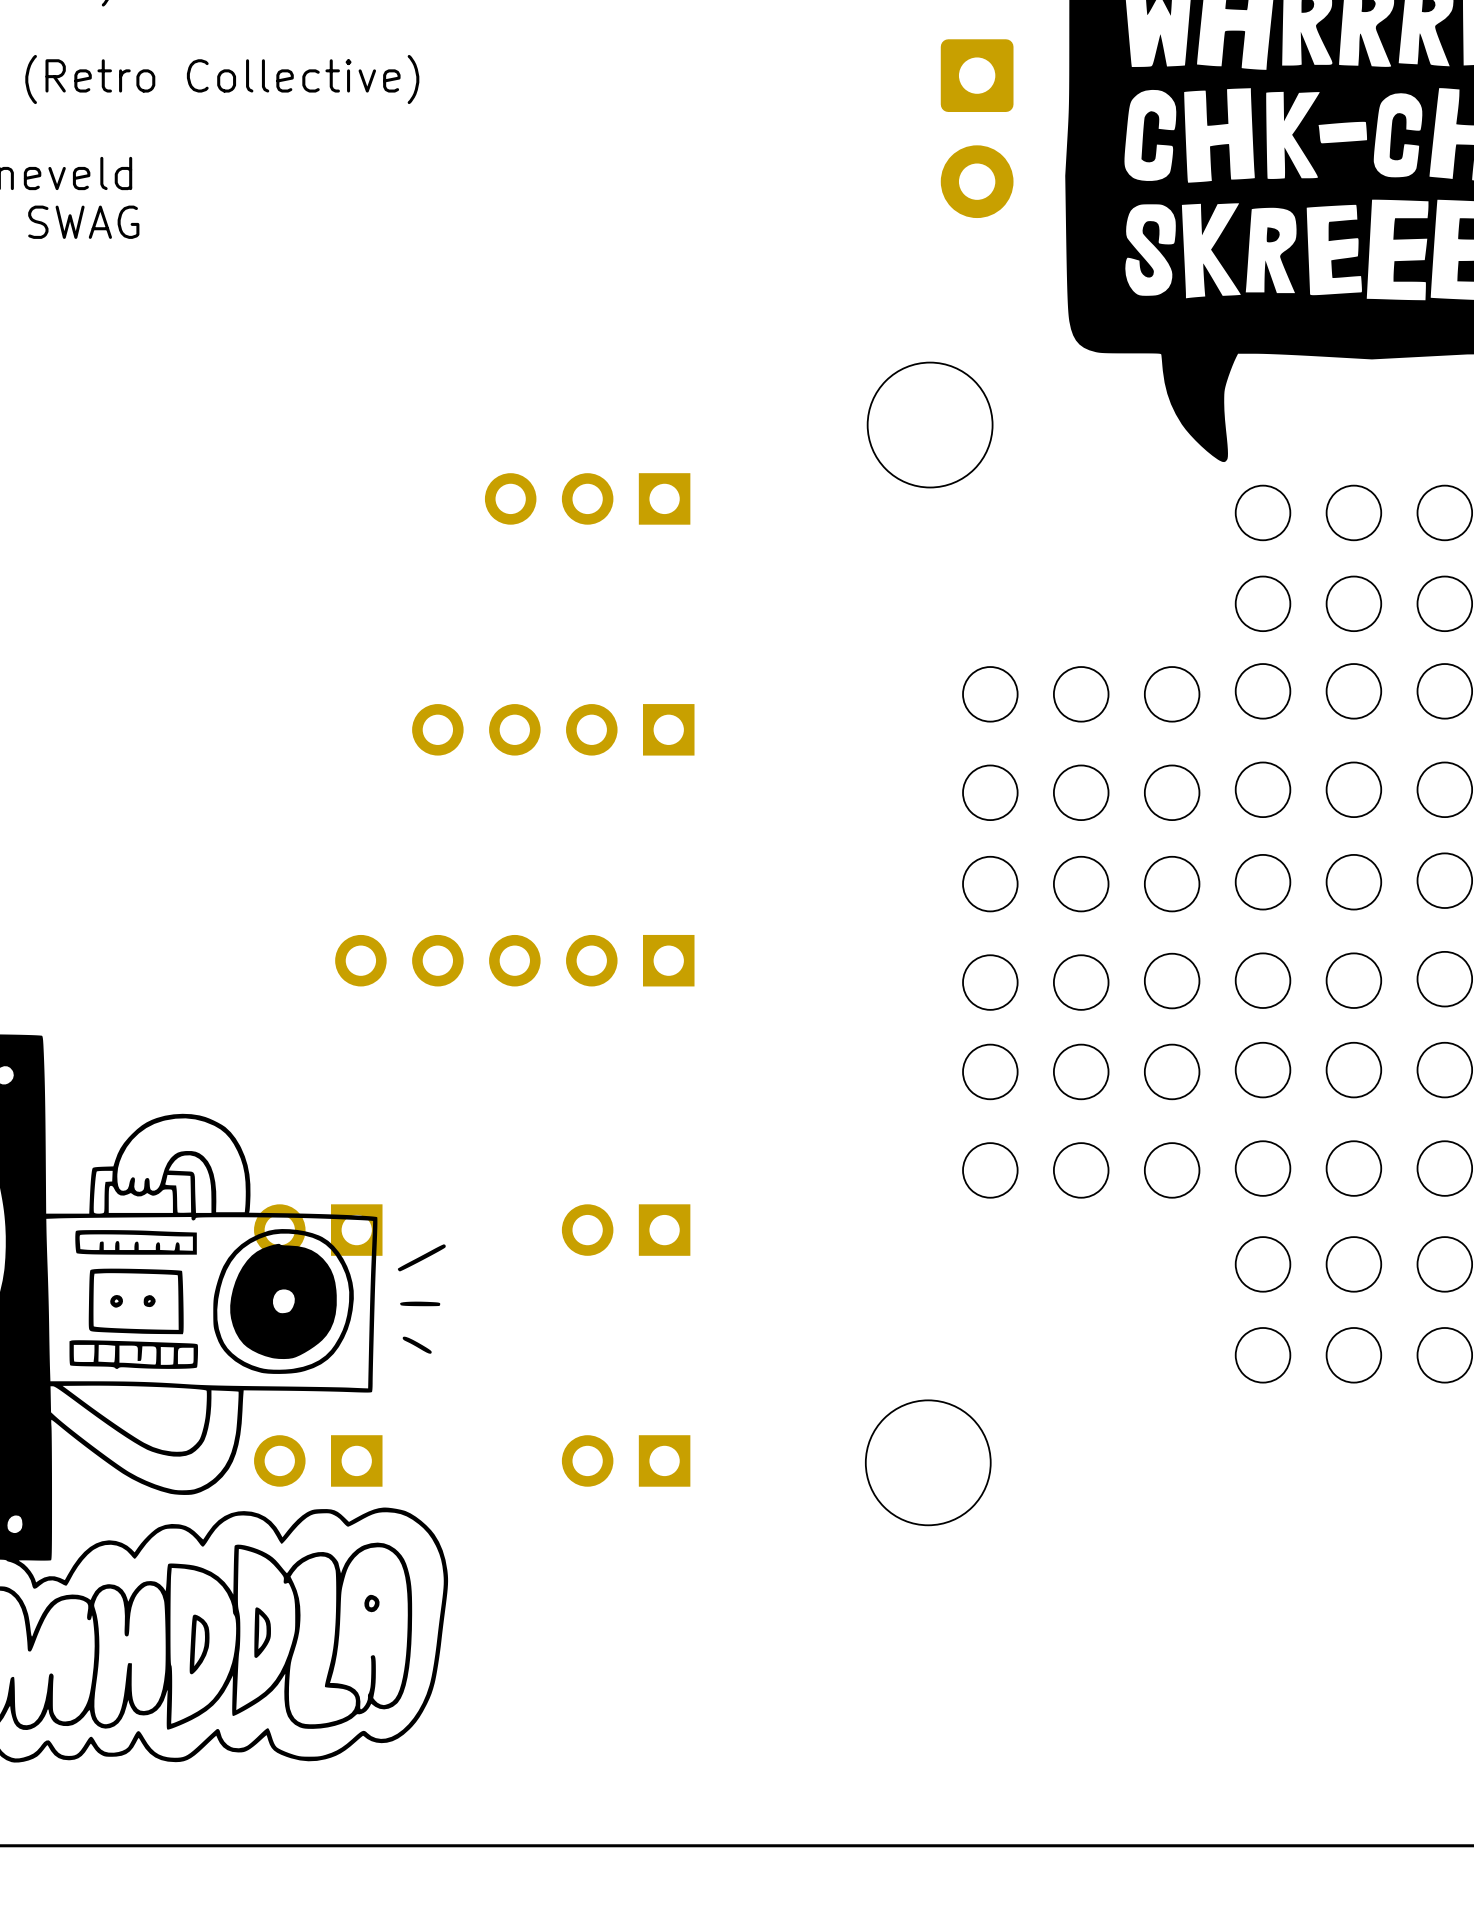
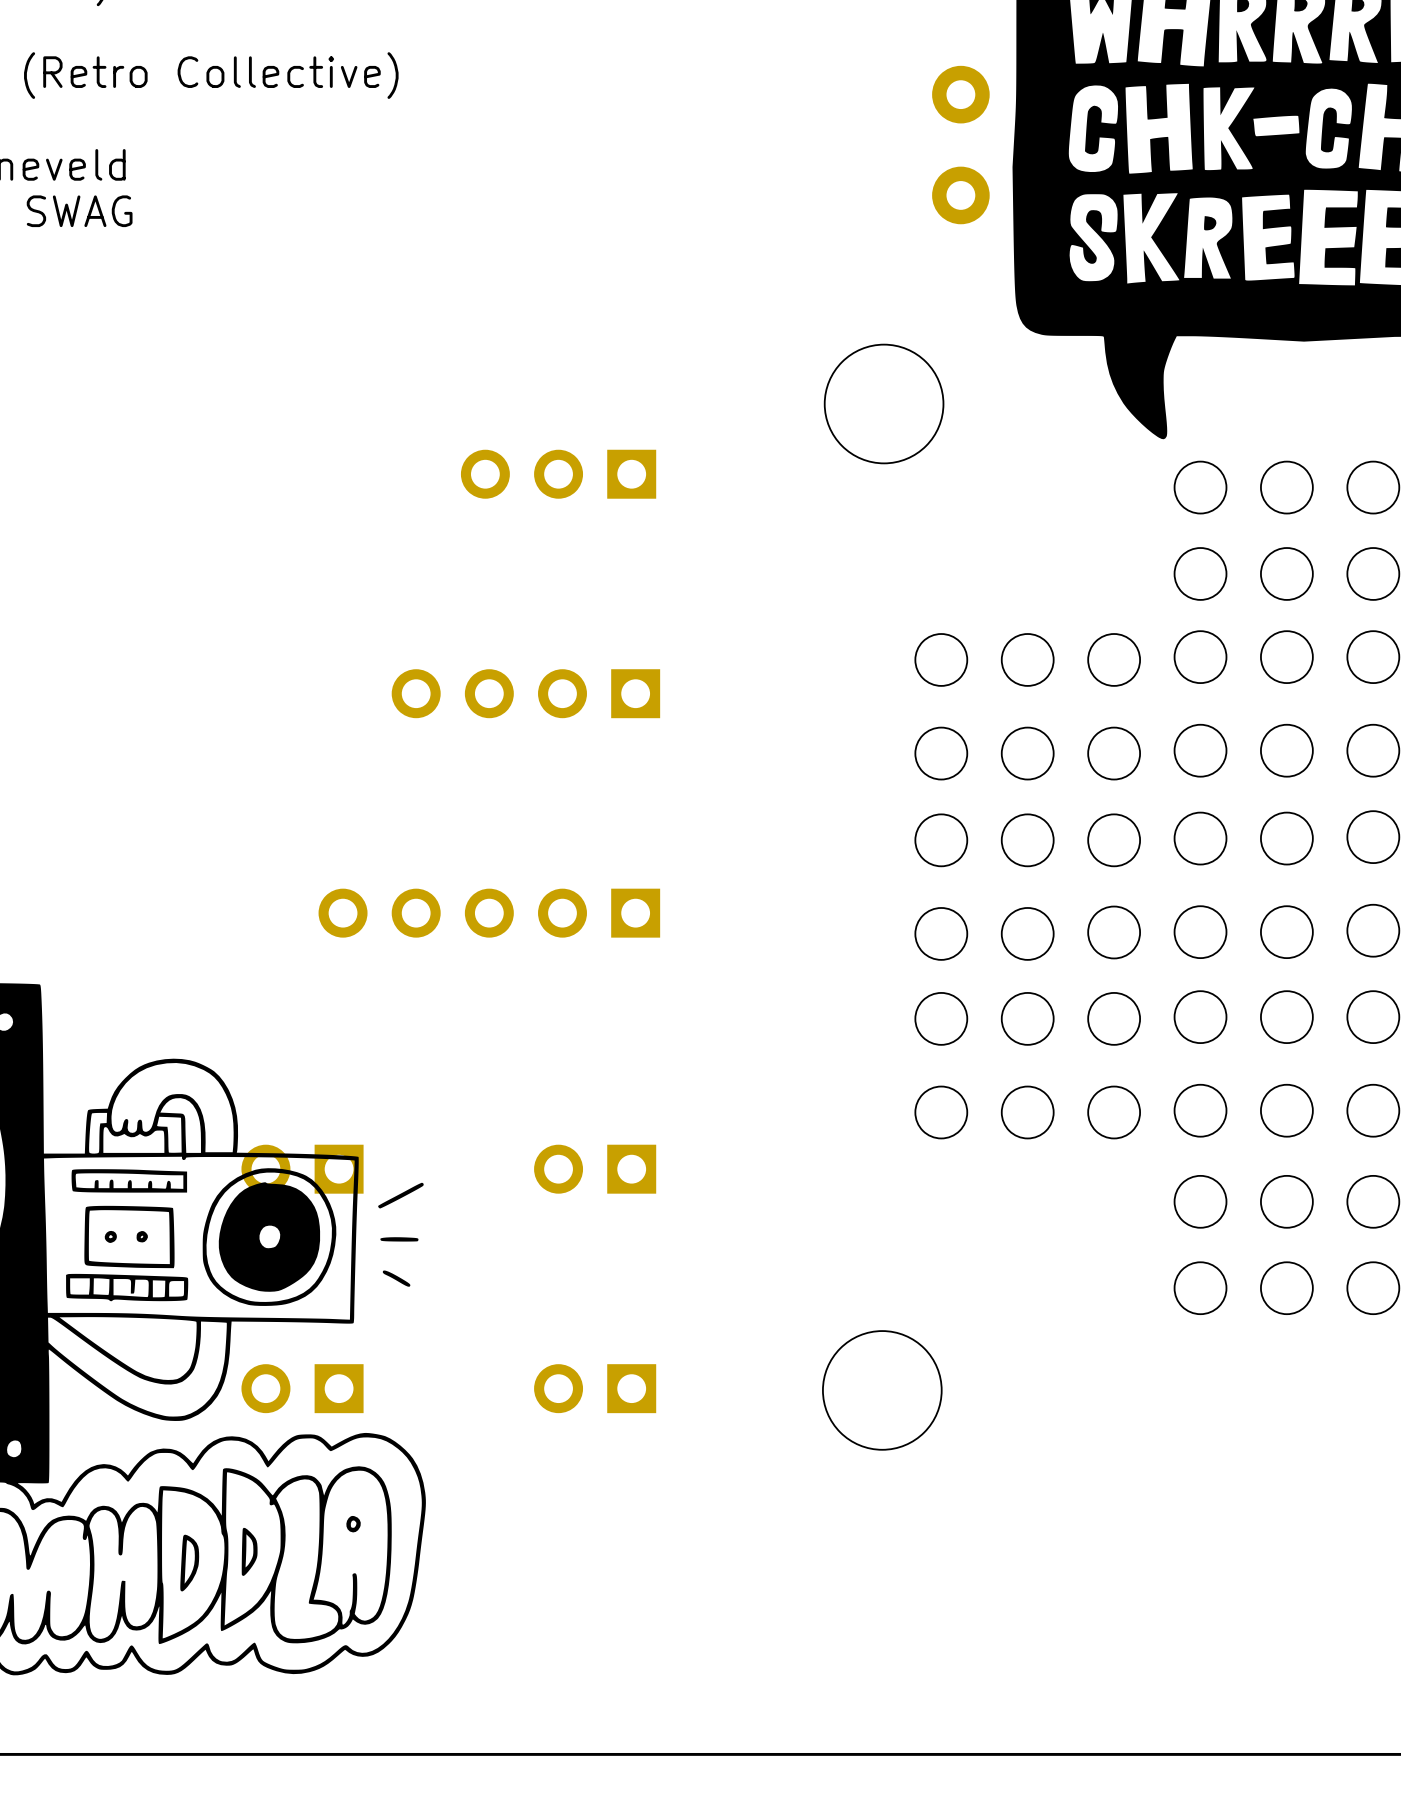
part: (977, 128) -> none
part: none -> (960, 145)

